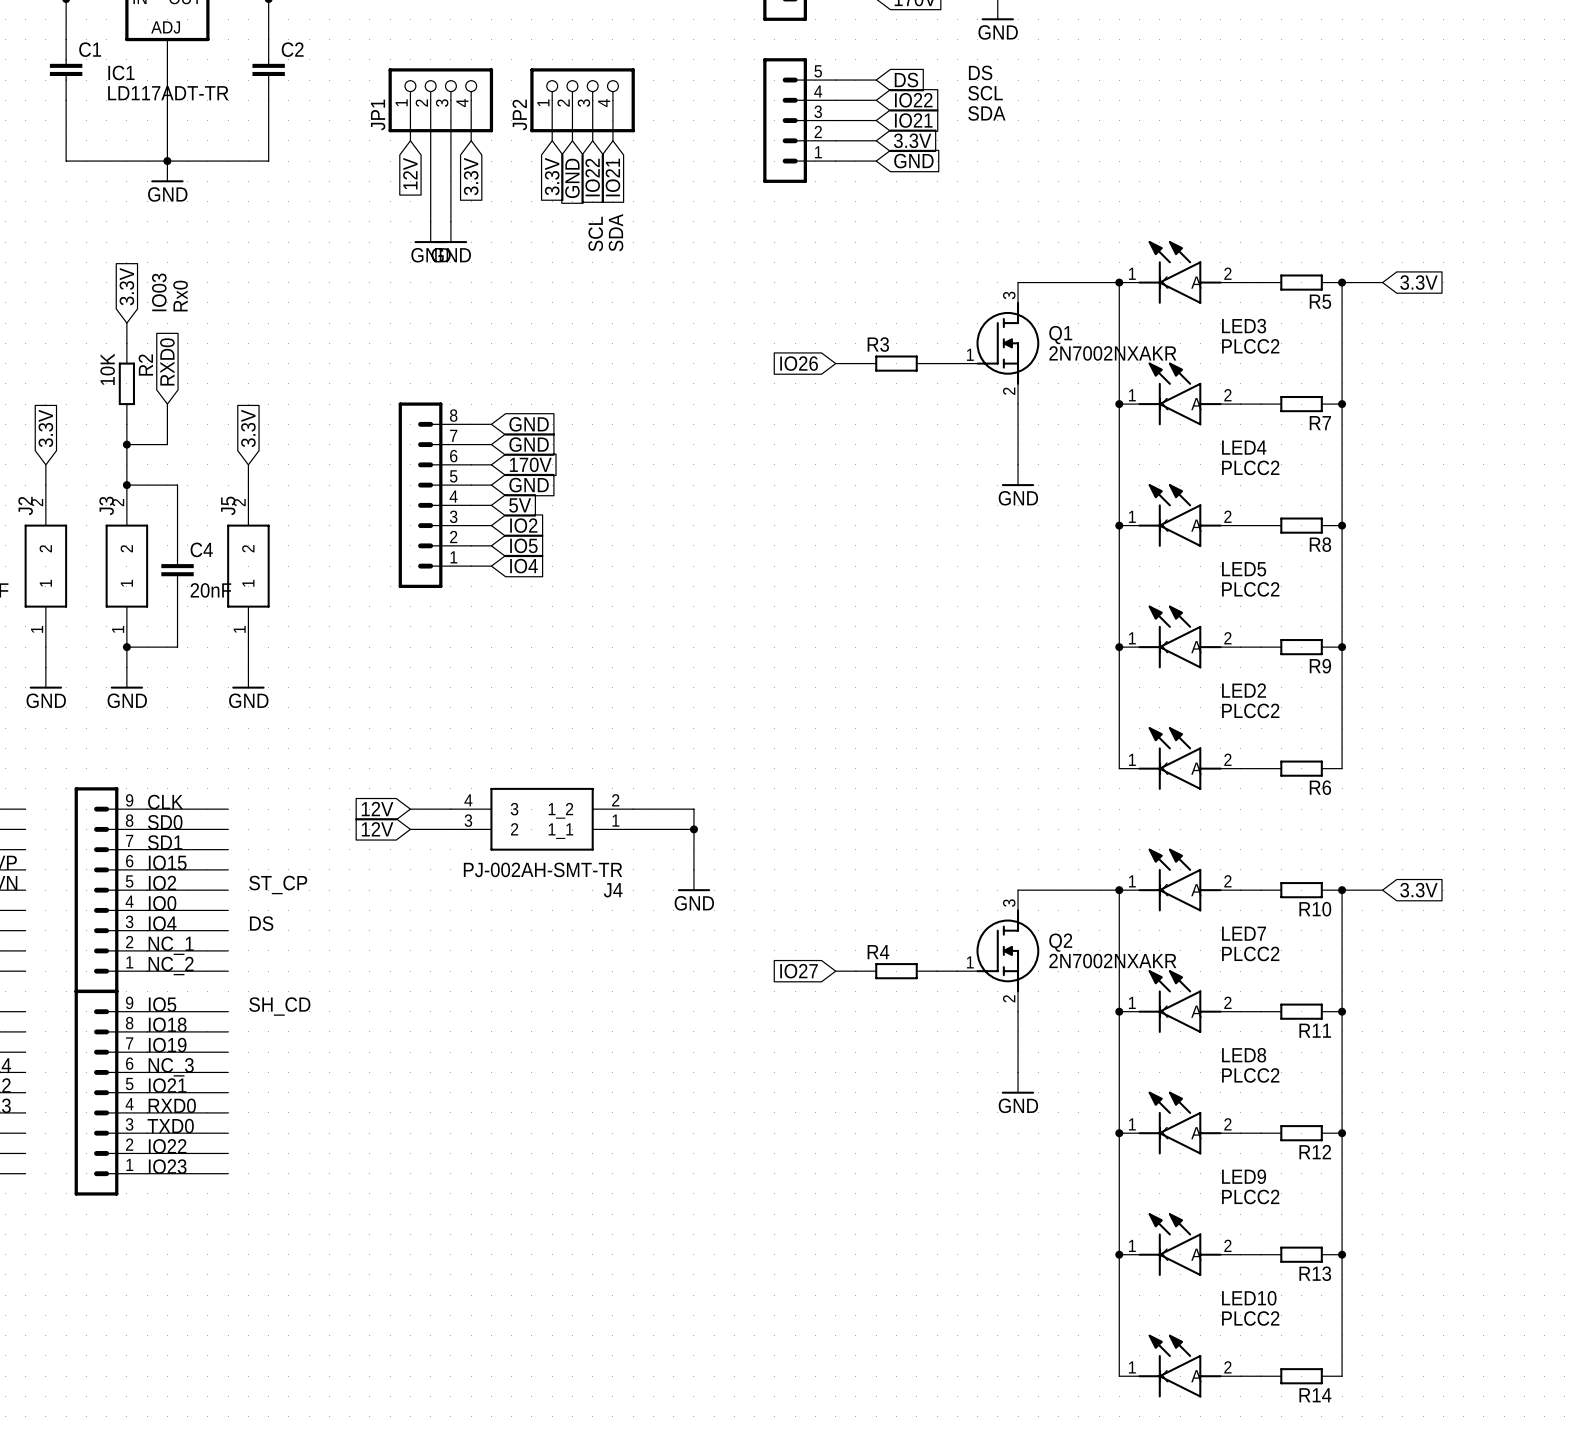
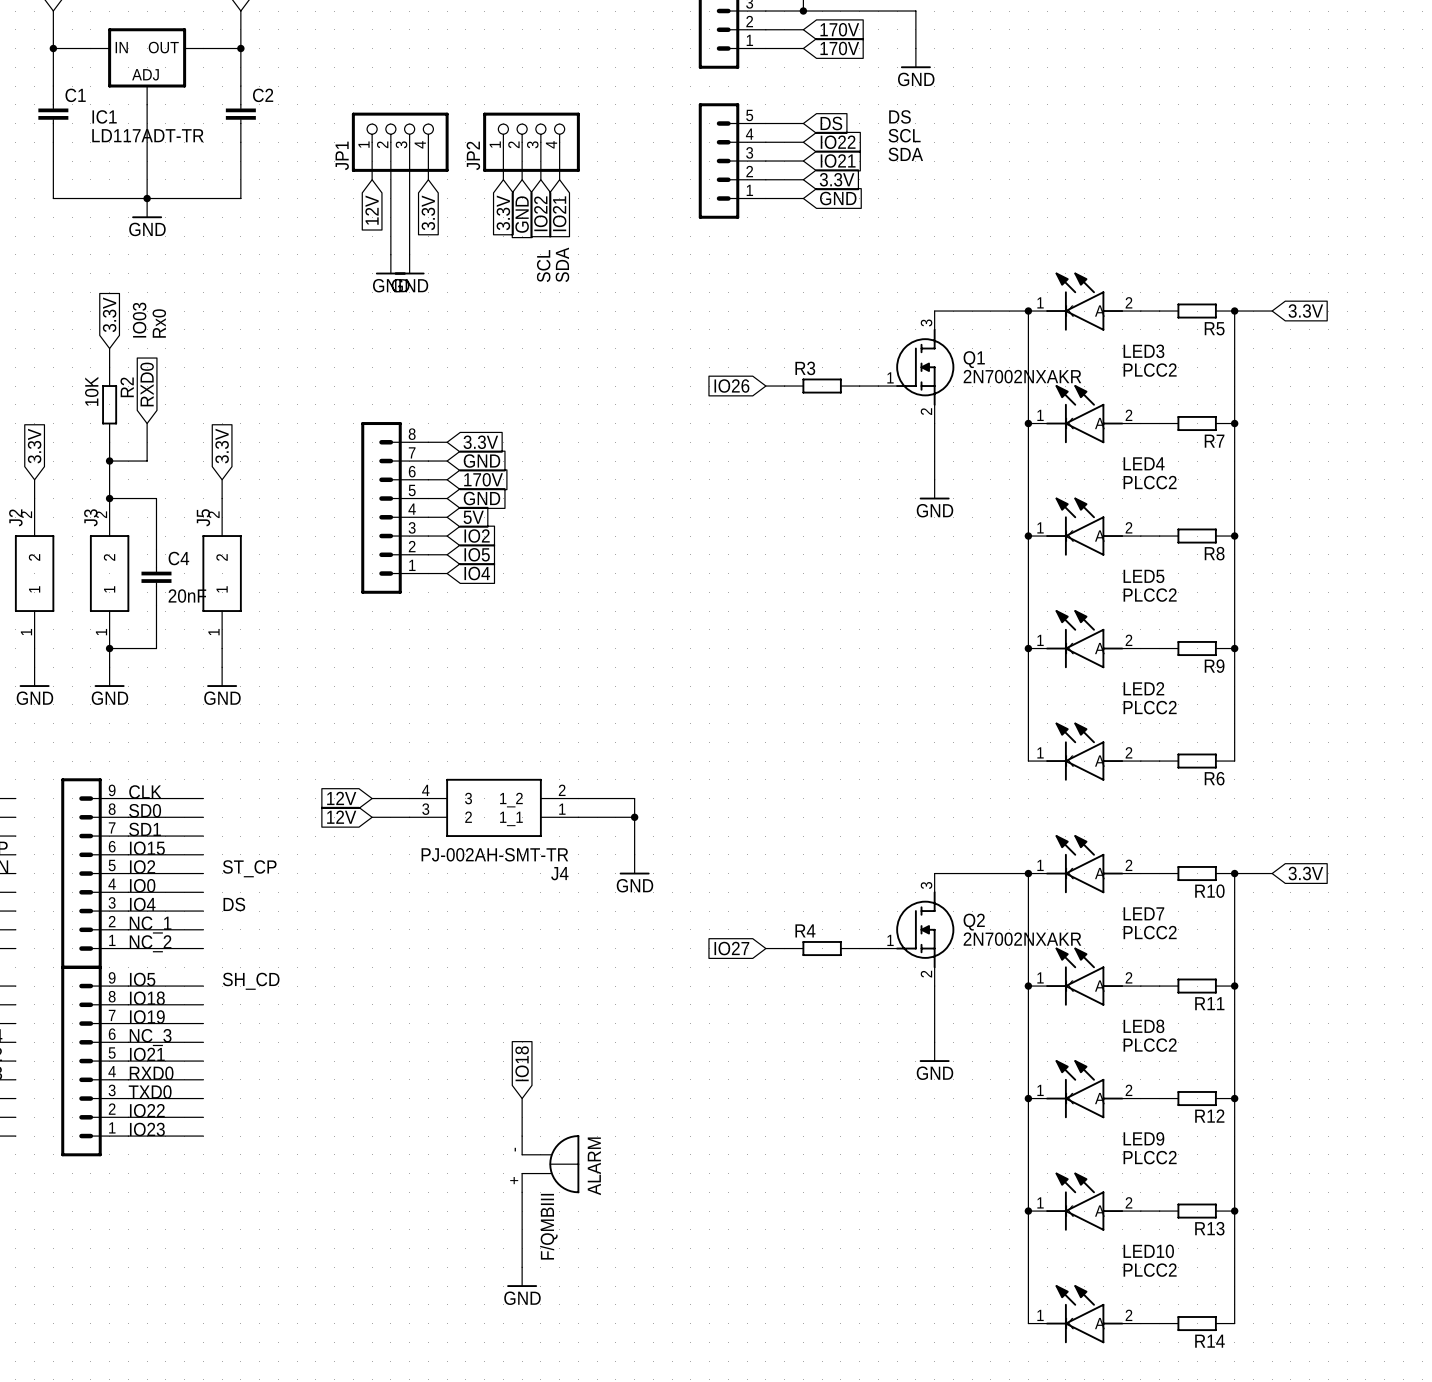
global label: GND (529, 424) -> 3.3V (480, 442)
global label: none -> IO18 (522, 1063)
wire: none -> (522, 1098) (522, 1136)
ALARM: none -> F/QMBIII (550, 1164)
wire: none -> (522, 1192) (522, 1267)
power symbol: none -> GND (522, 1277)

